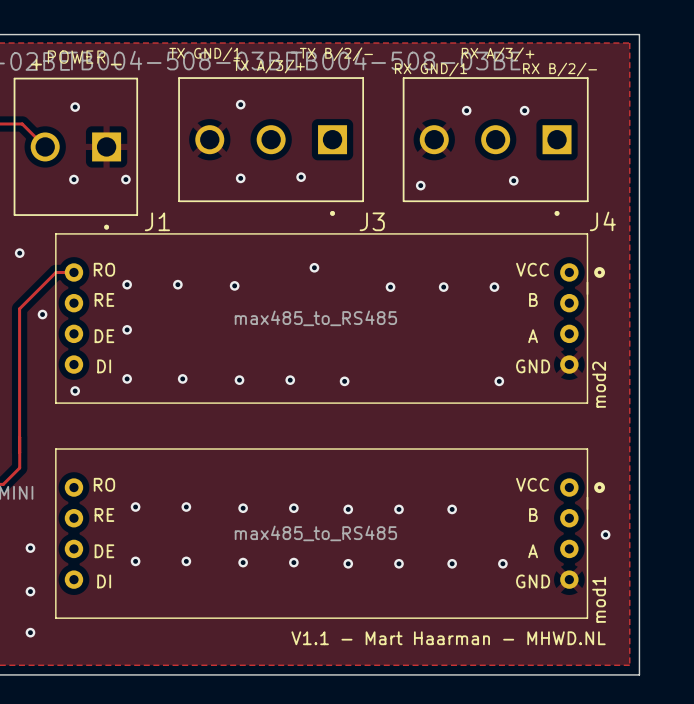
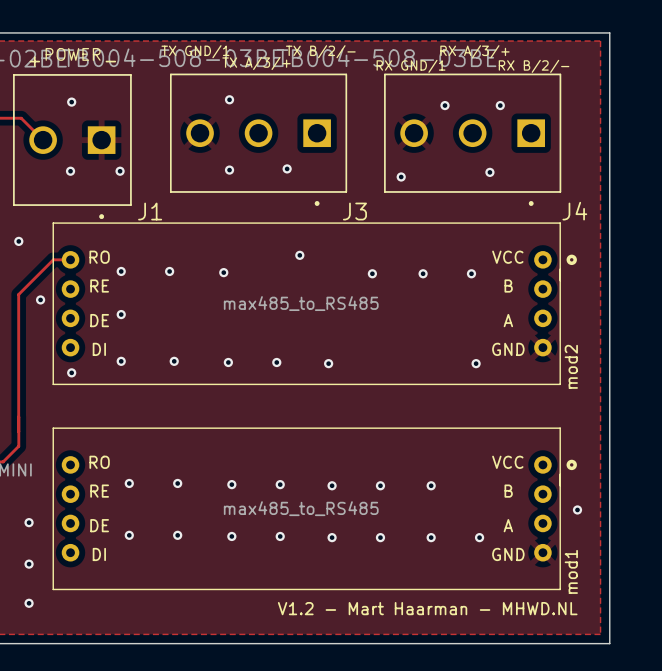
text: V1.1 - Mart Haarman - MHWD.NL (448, 638) -> V1.2 - Mart Haarman - MHWD.NL (427, 608)

